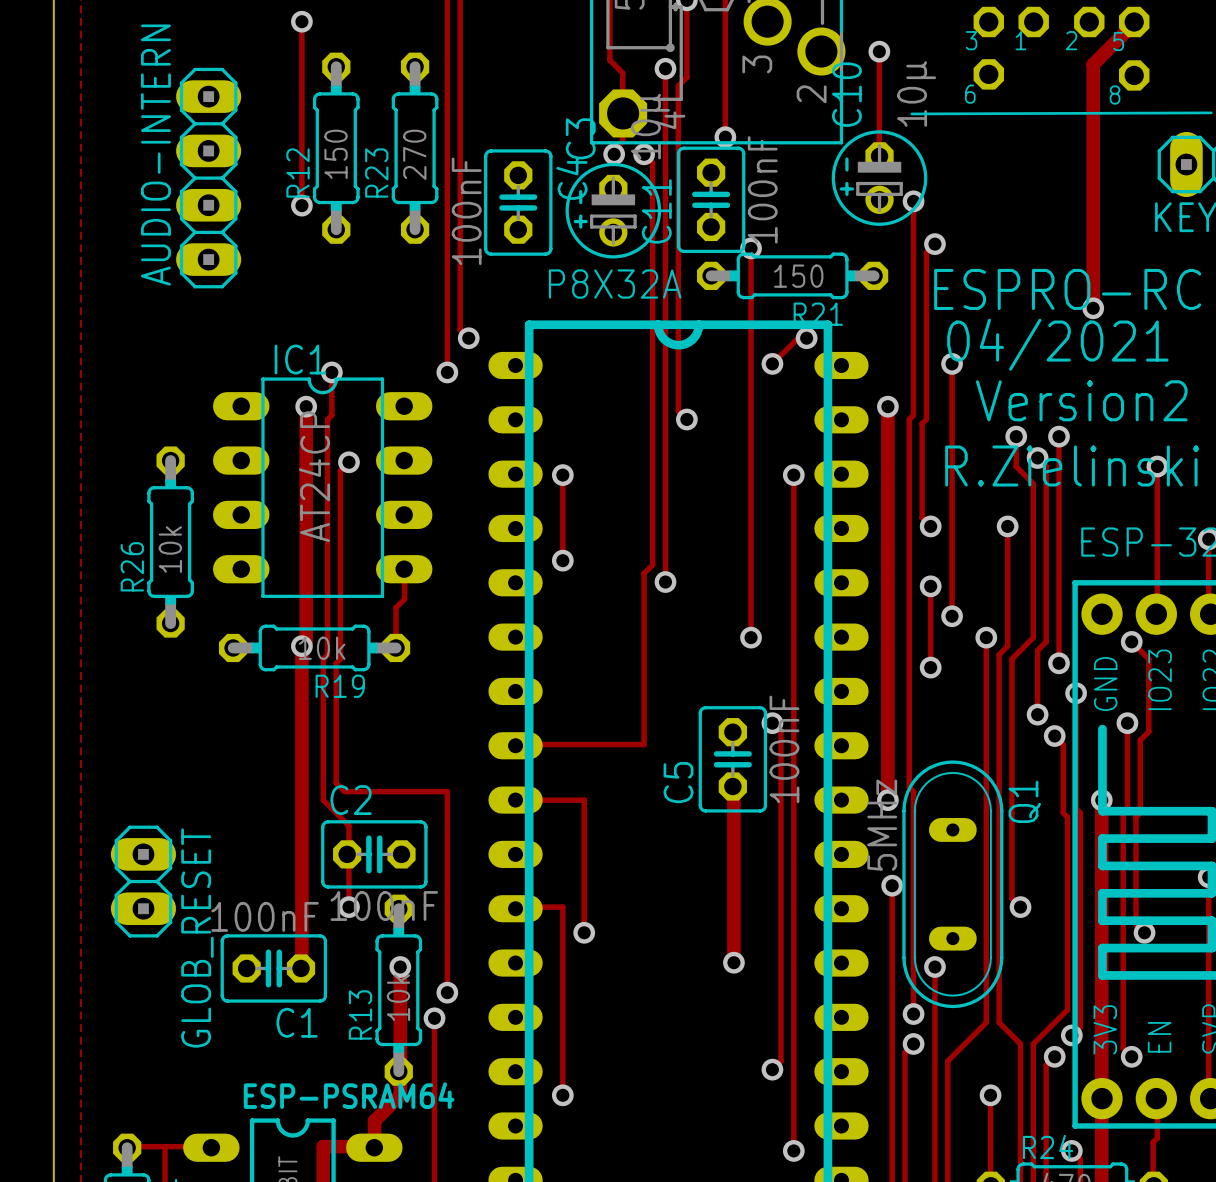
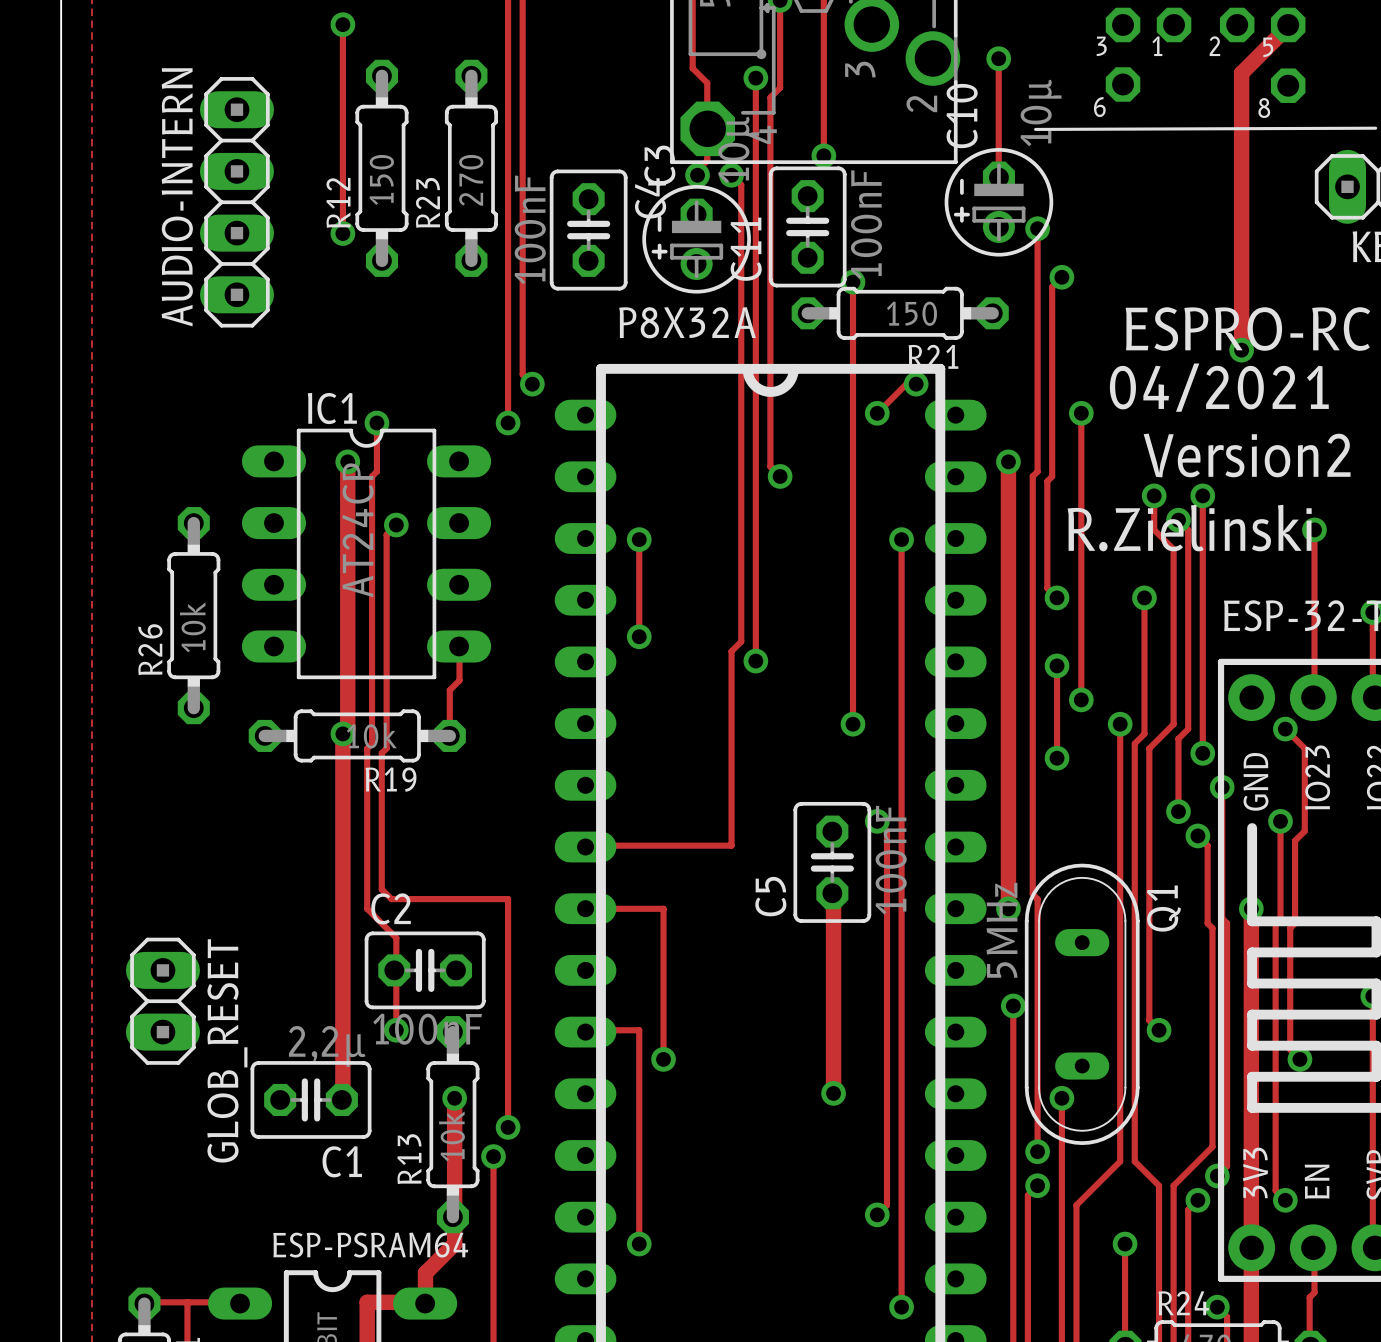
C1 value: 100nF (265, 916) -> 2,2µ (327, 1046)

